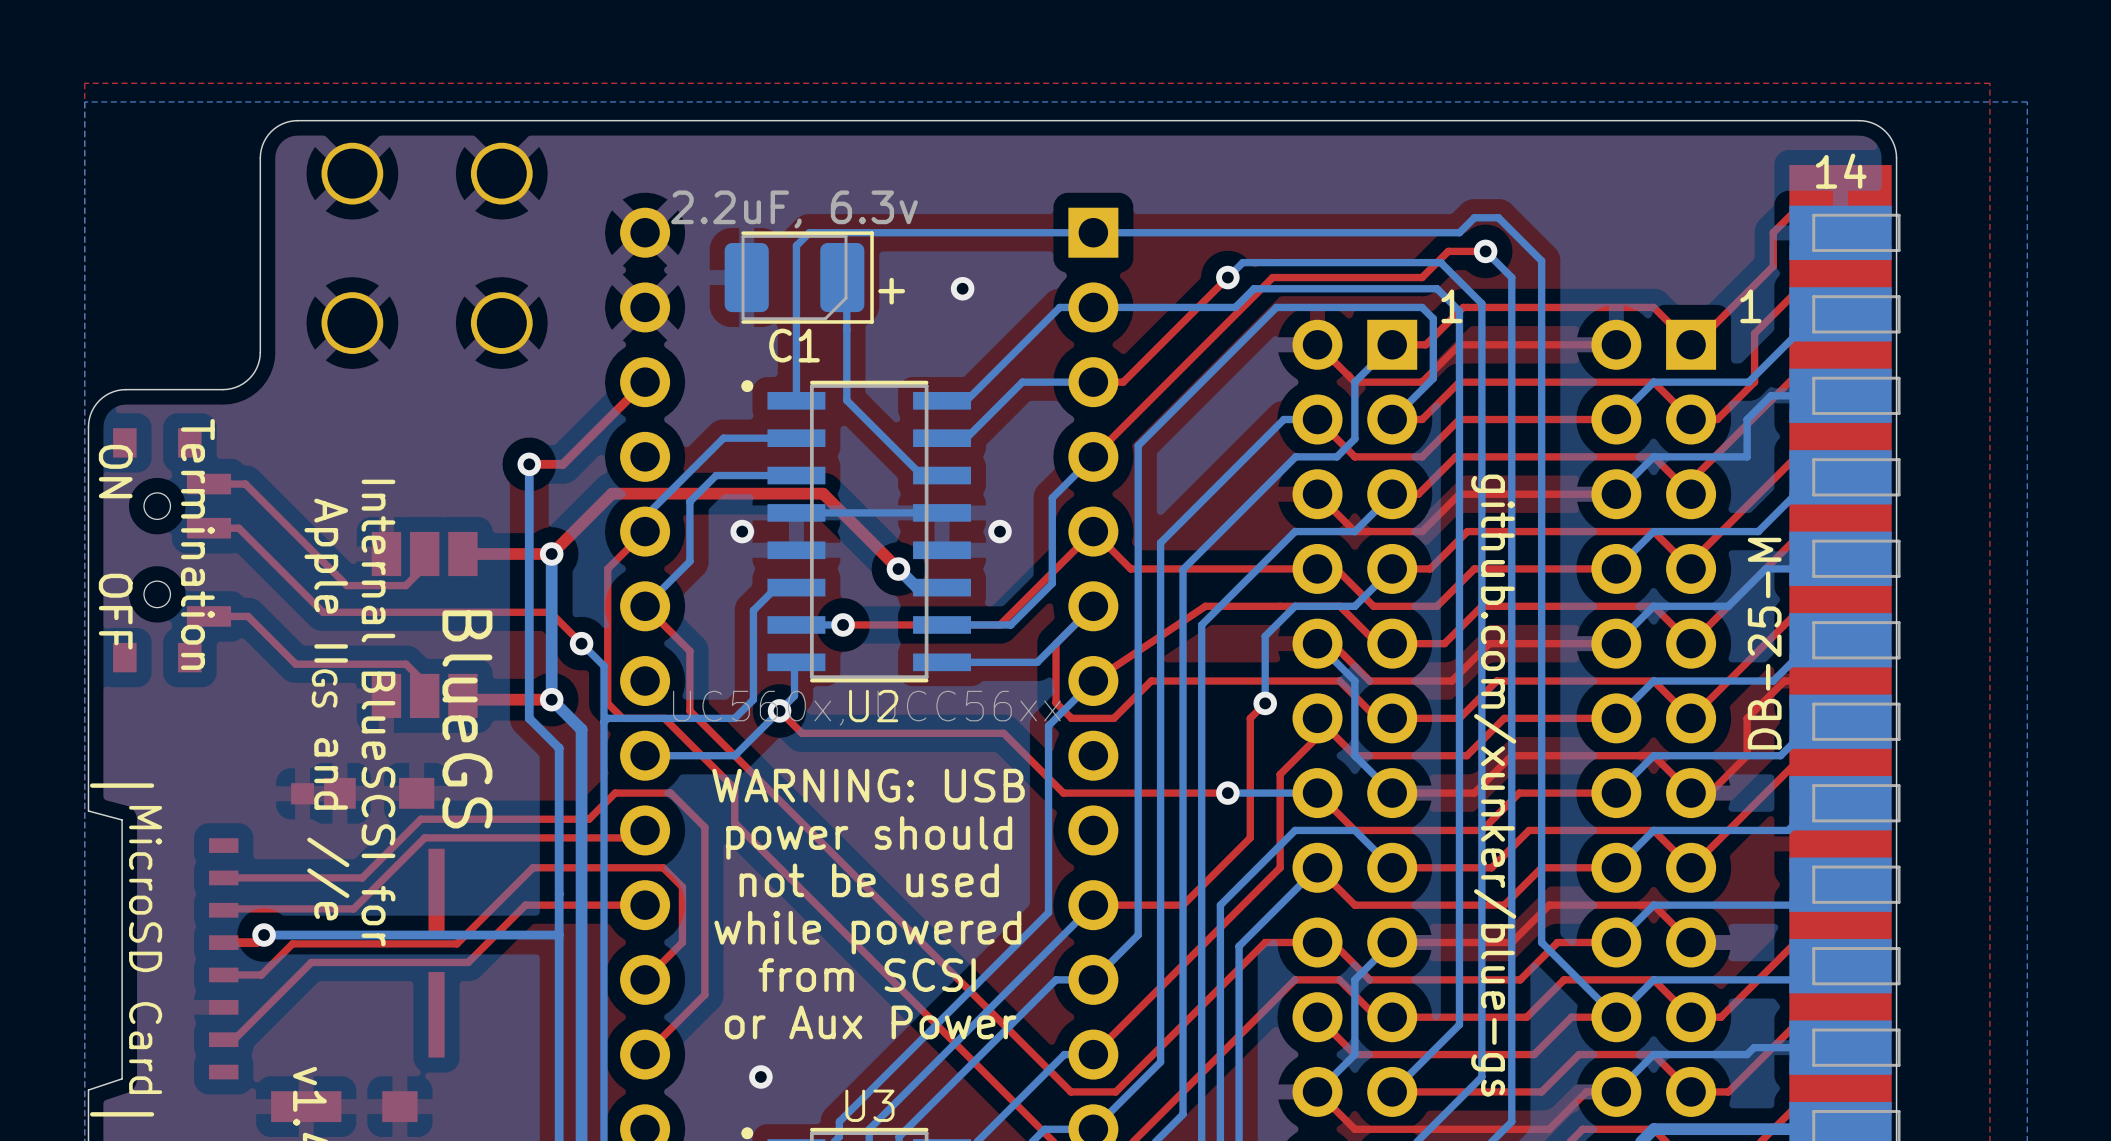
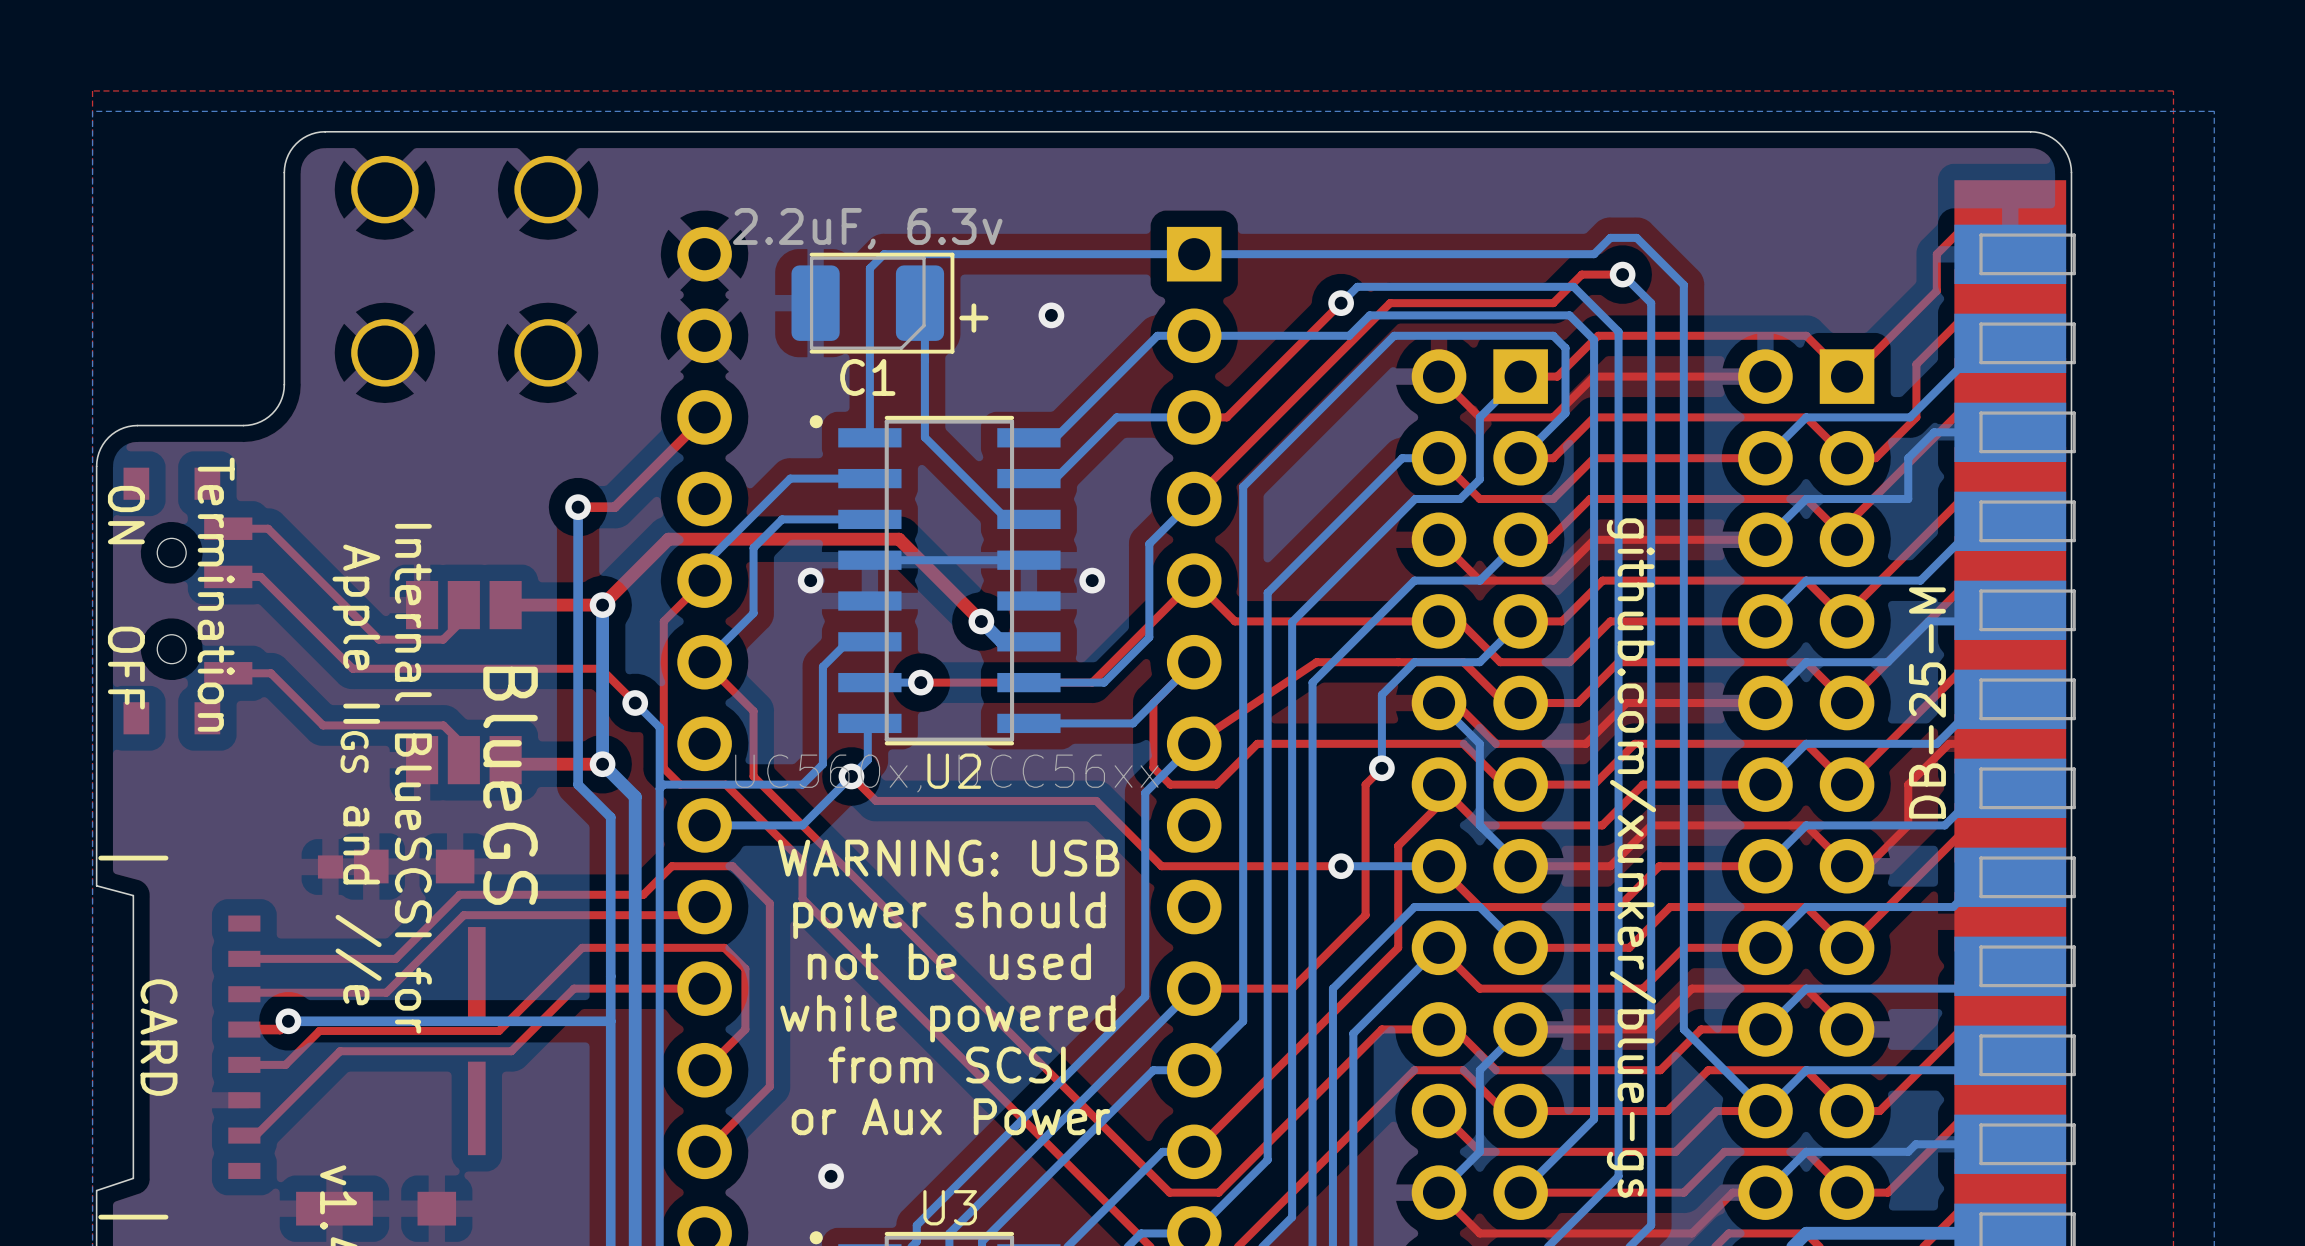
text: 14 (1841, 171) -> none
text: 1 (1452, 306) -> none
text: 1 (1750, 306) -> none
text: MicroSD Card (145, 949) -> CARD (159, 1037)

